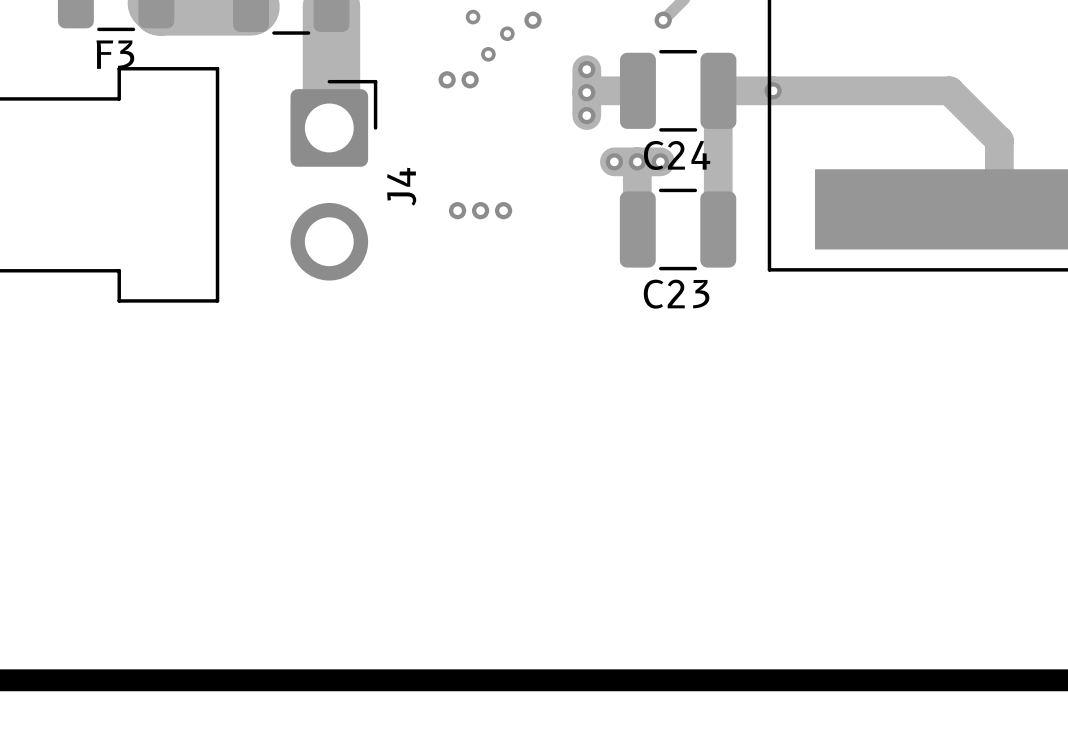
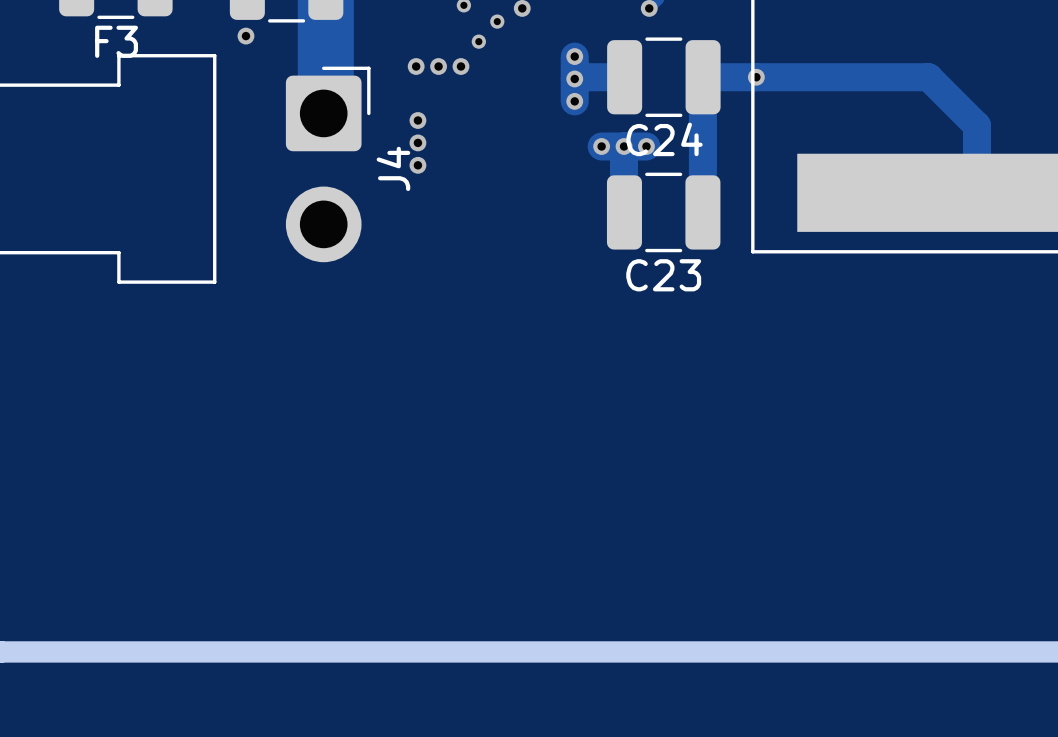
via: none -> (245, 36)
via: none -> (416, 66)
via: none -> (417, 120)
via: none -> (417, 142)
via: none -> (417, 165)
via: (457, 210) -> none
via: (480, 210) -> none
via: (503, 210) -> none

